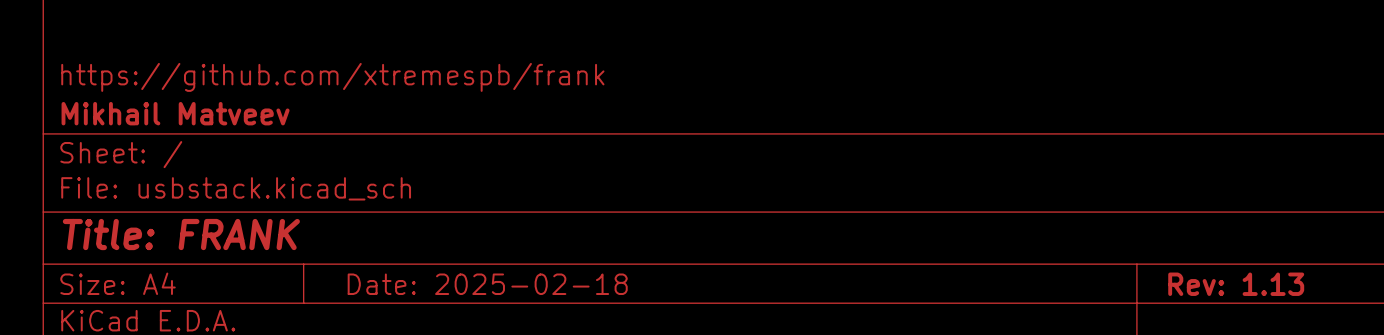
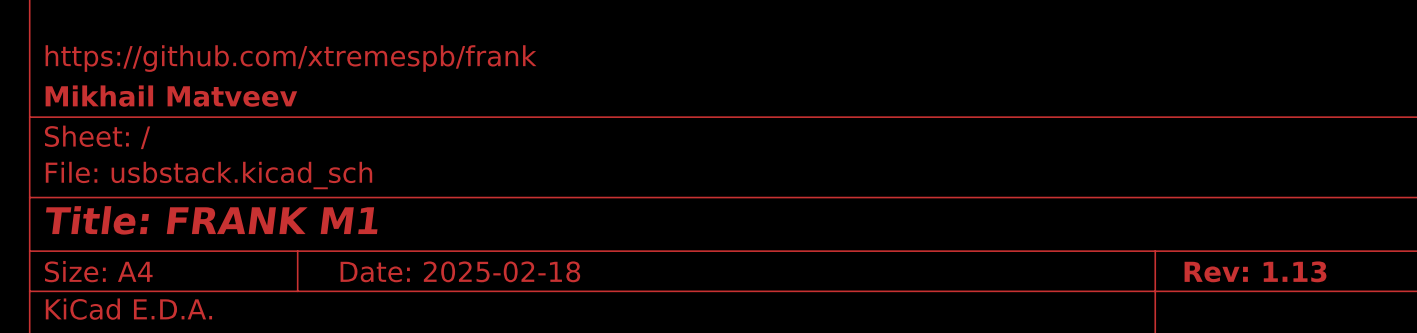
title block: Title: FRANK (181, 234) -> Title: FRANK M1 (211, 220)

